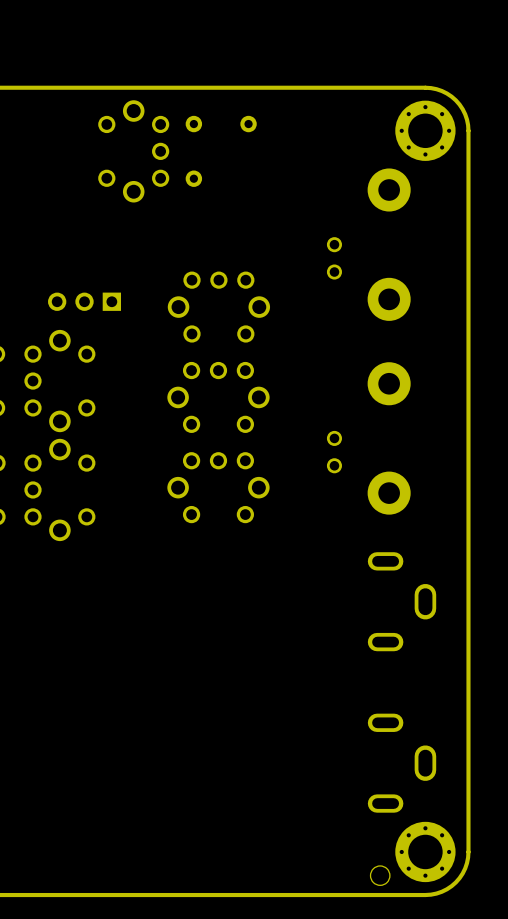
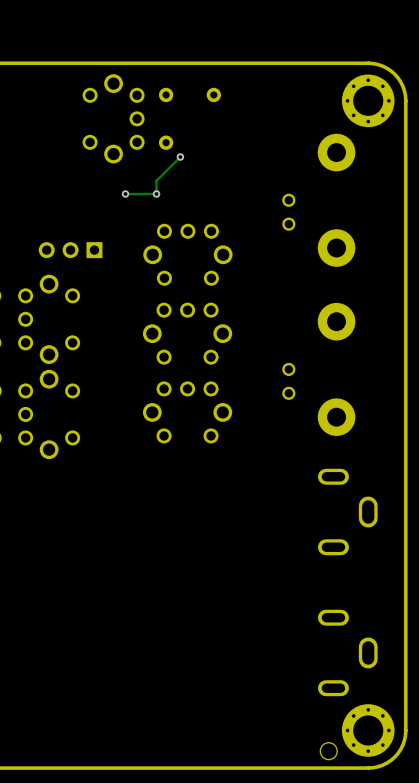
track: none -> (180, 157) (156, 180) (156, 194) (125, 194)
via: none -> (180, 157)
via: none -> (125, 194)
via: none -> (156, 194)

